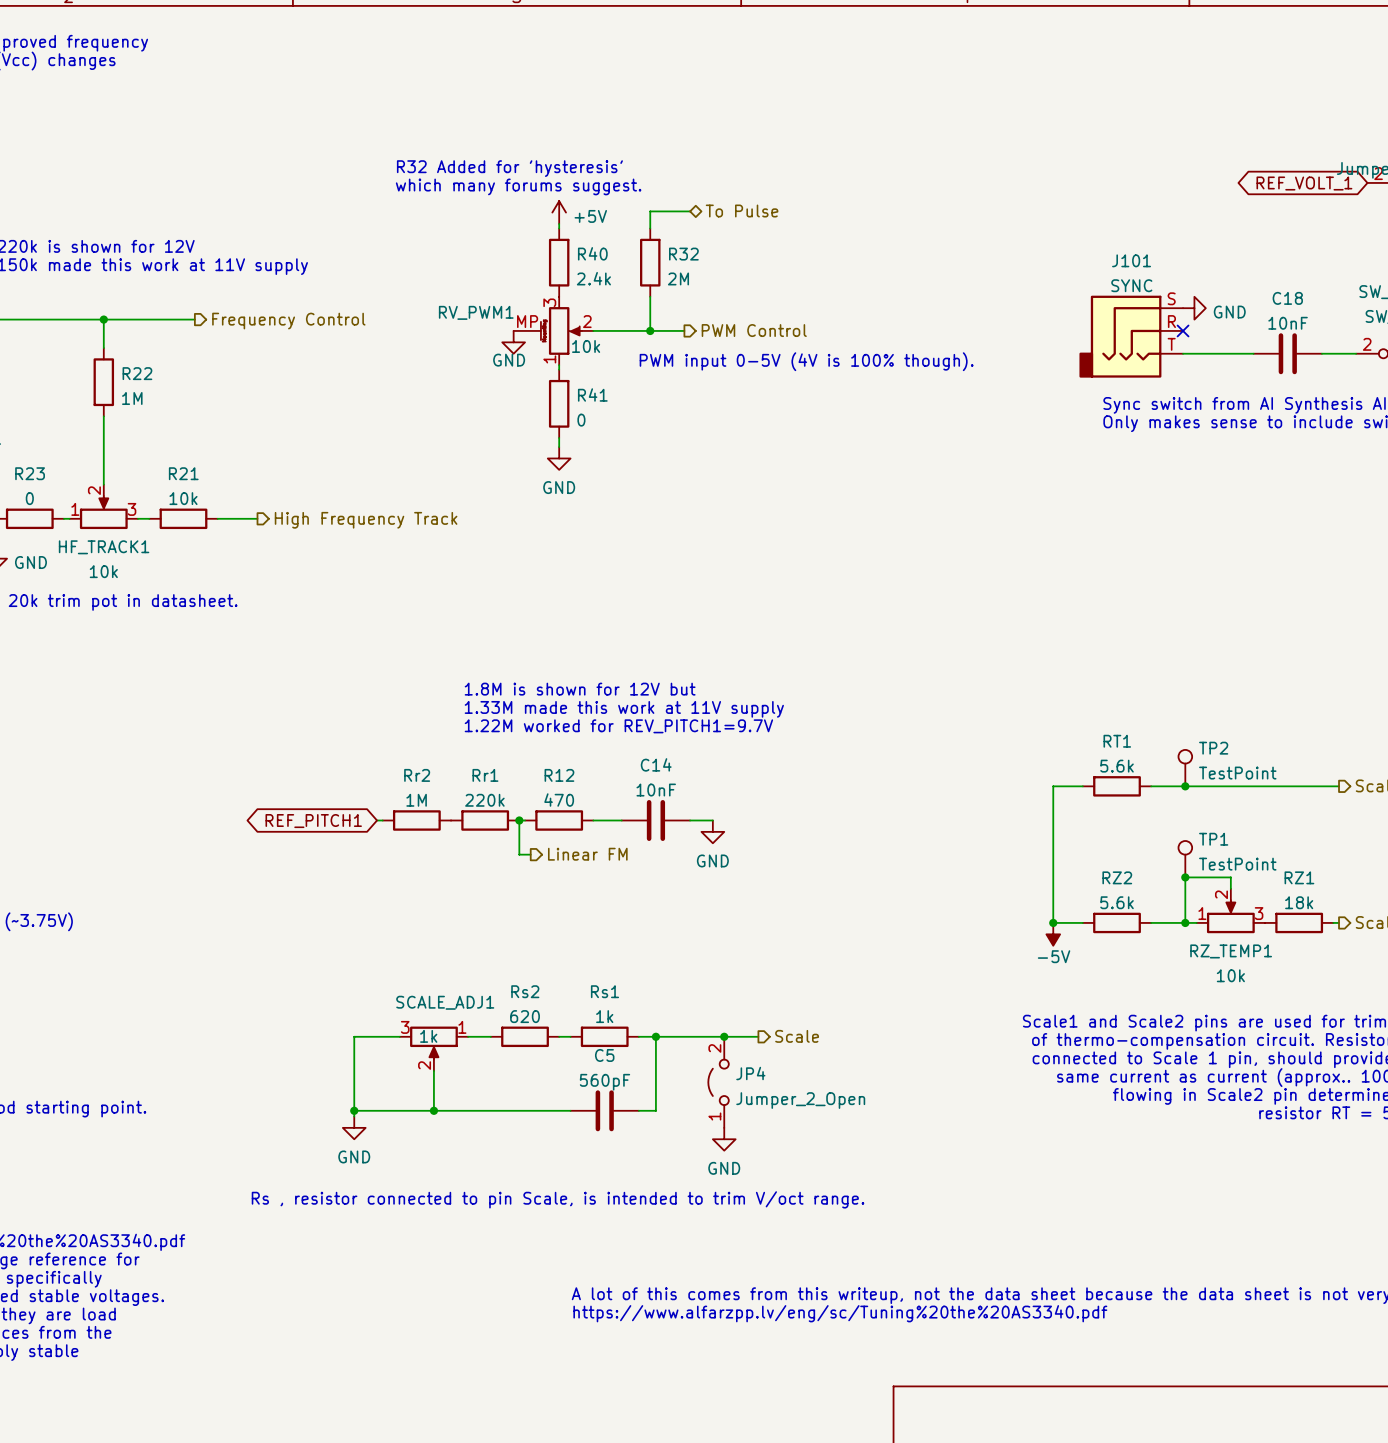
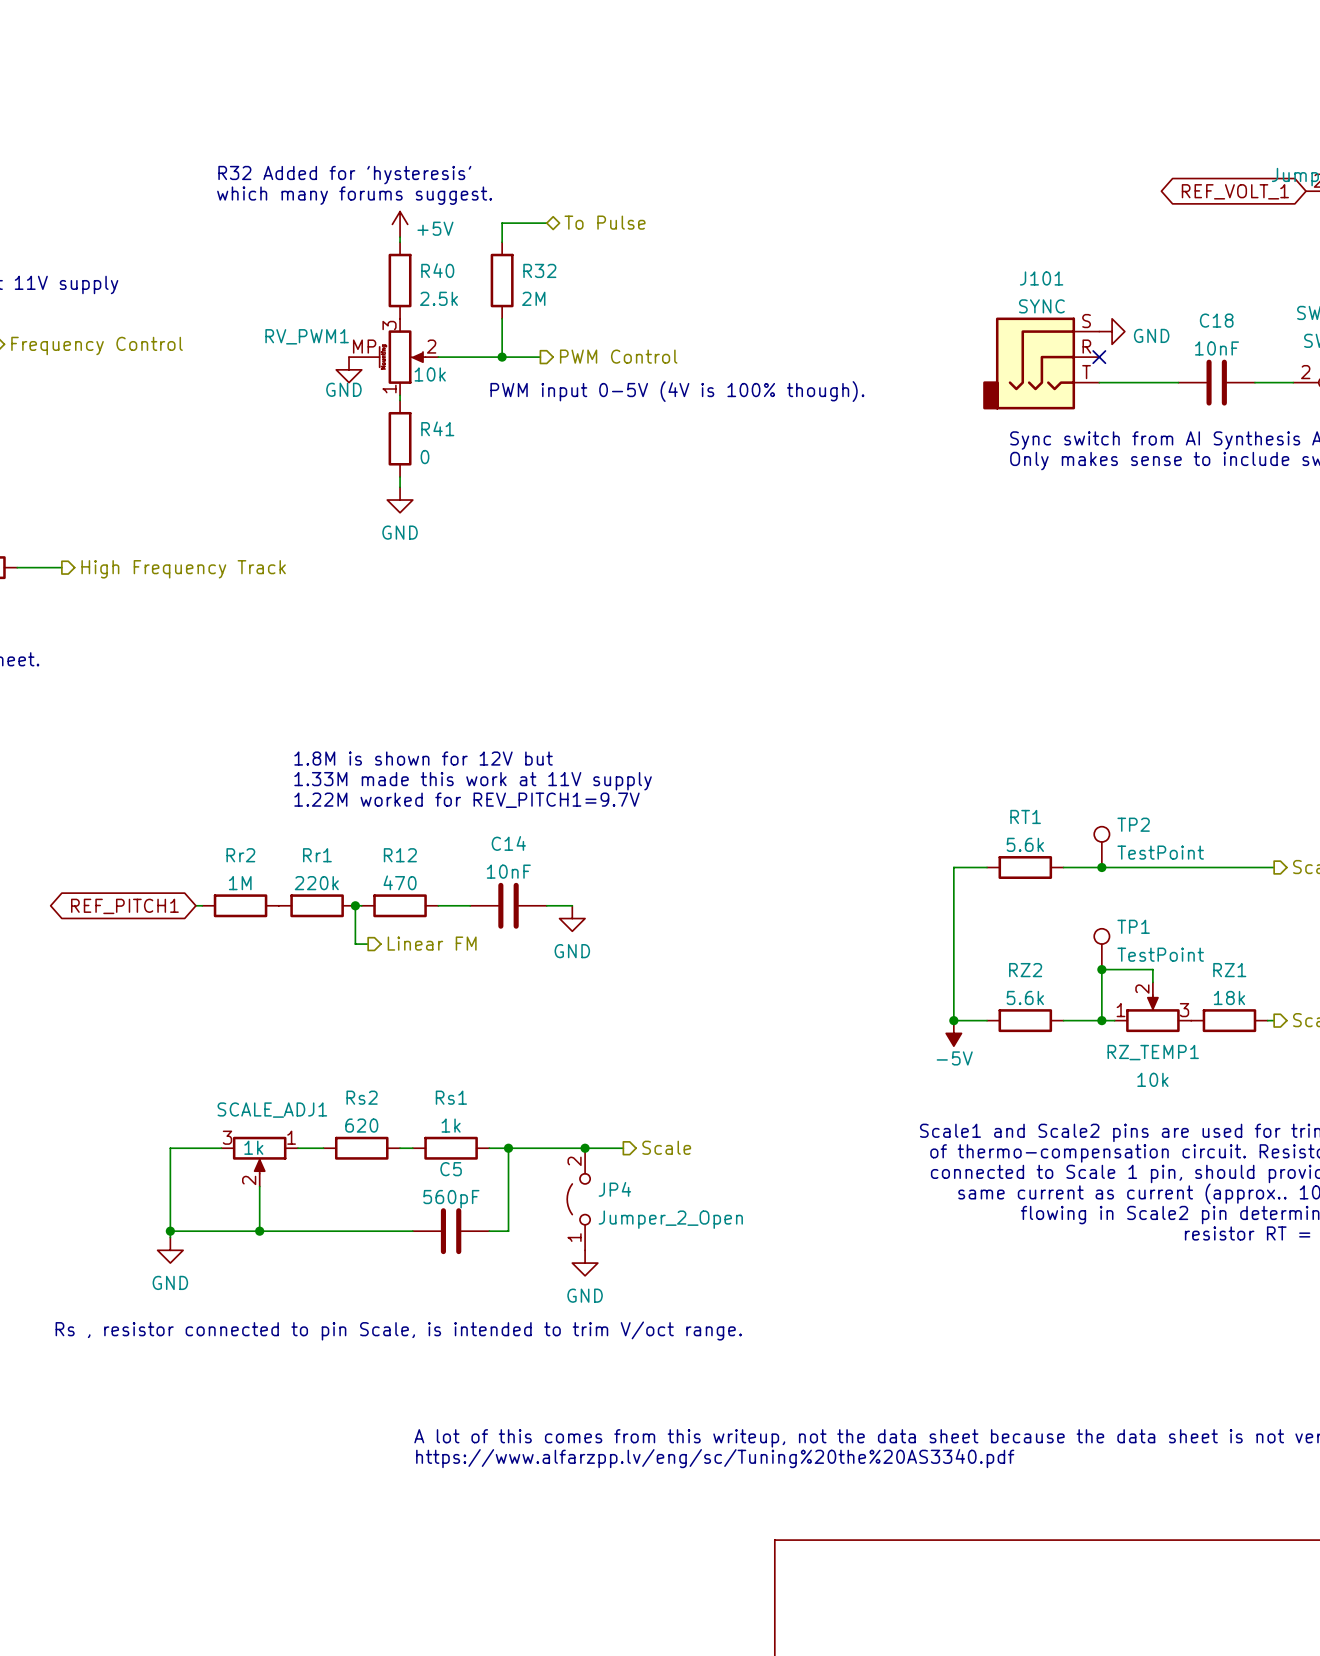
R40 value: 2.4k (593, 278) -> 2.5k (438, 298)

